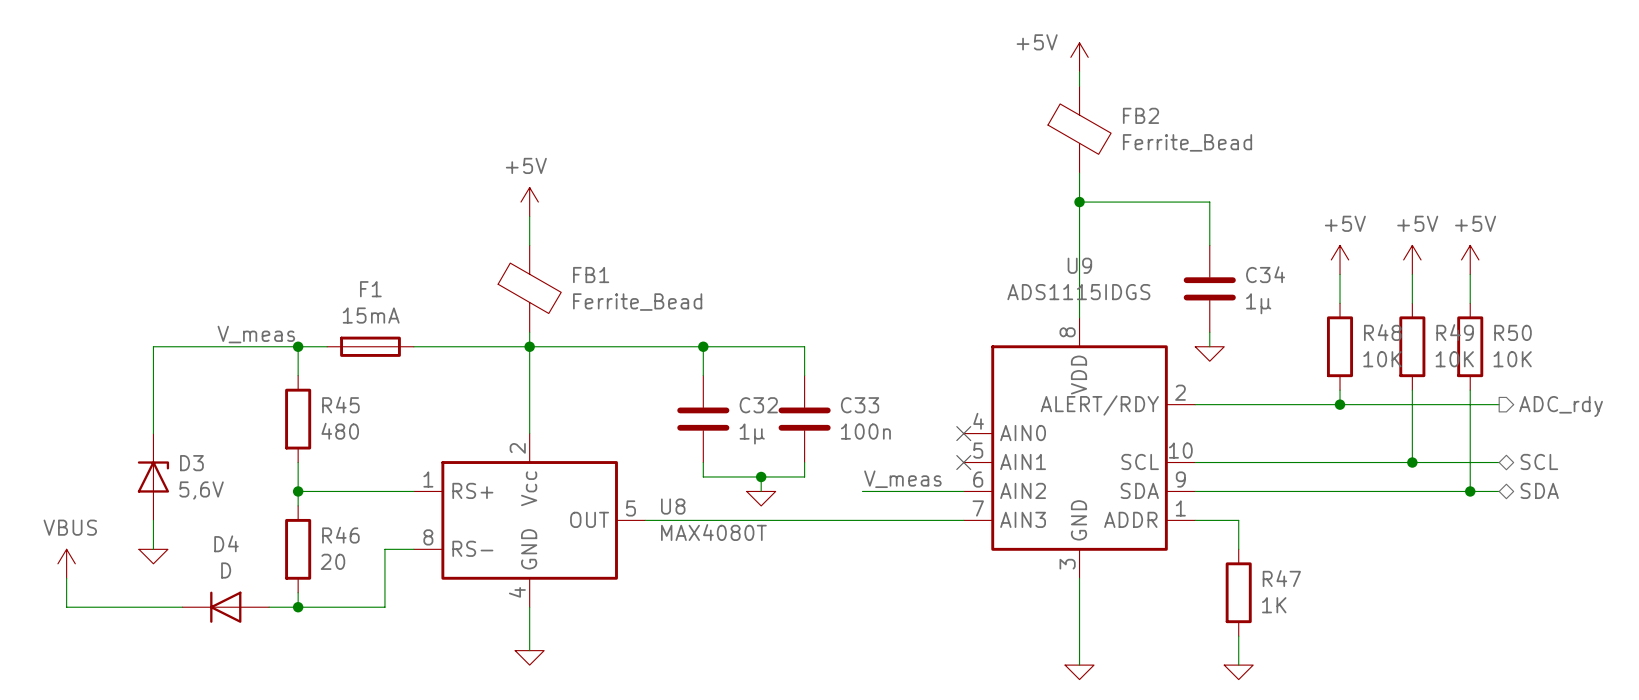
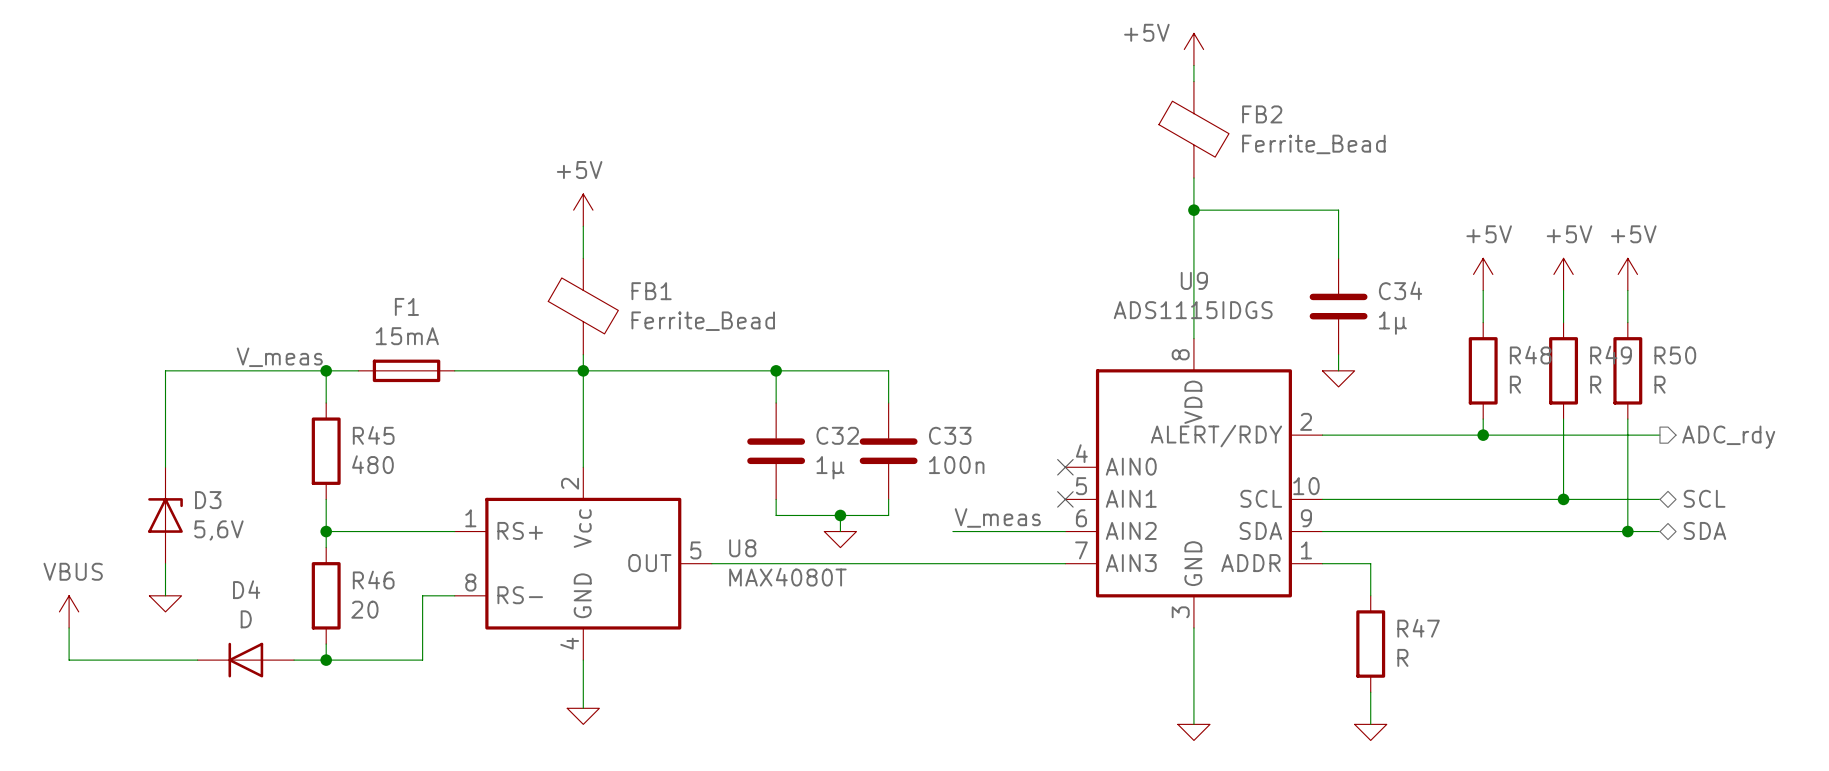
R48 value: 10K (1382, 359) -> R (1515, 384)
R49 value: 10K (1454, 359) -> R (1595, 384)
R50 value: 10K (1512, 359) -> R (1660, 384)
R47 value: 1K (1274, 605) -> R (1402, 657)

